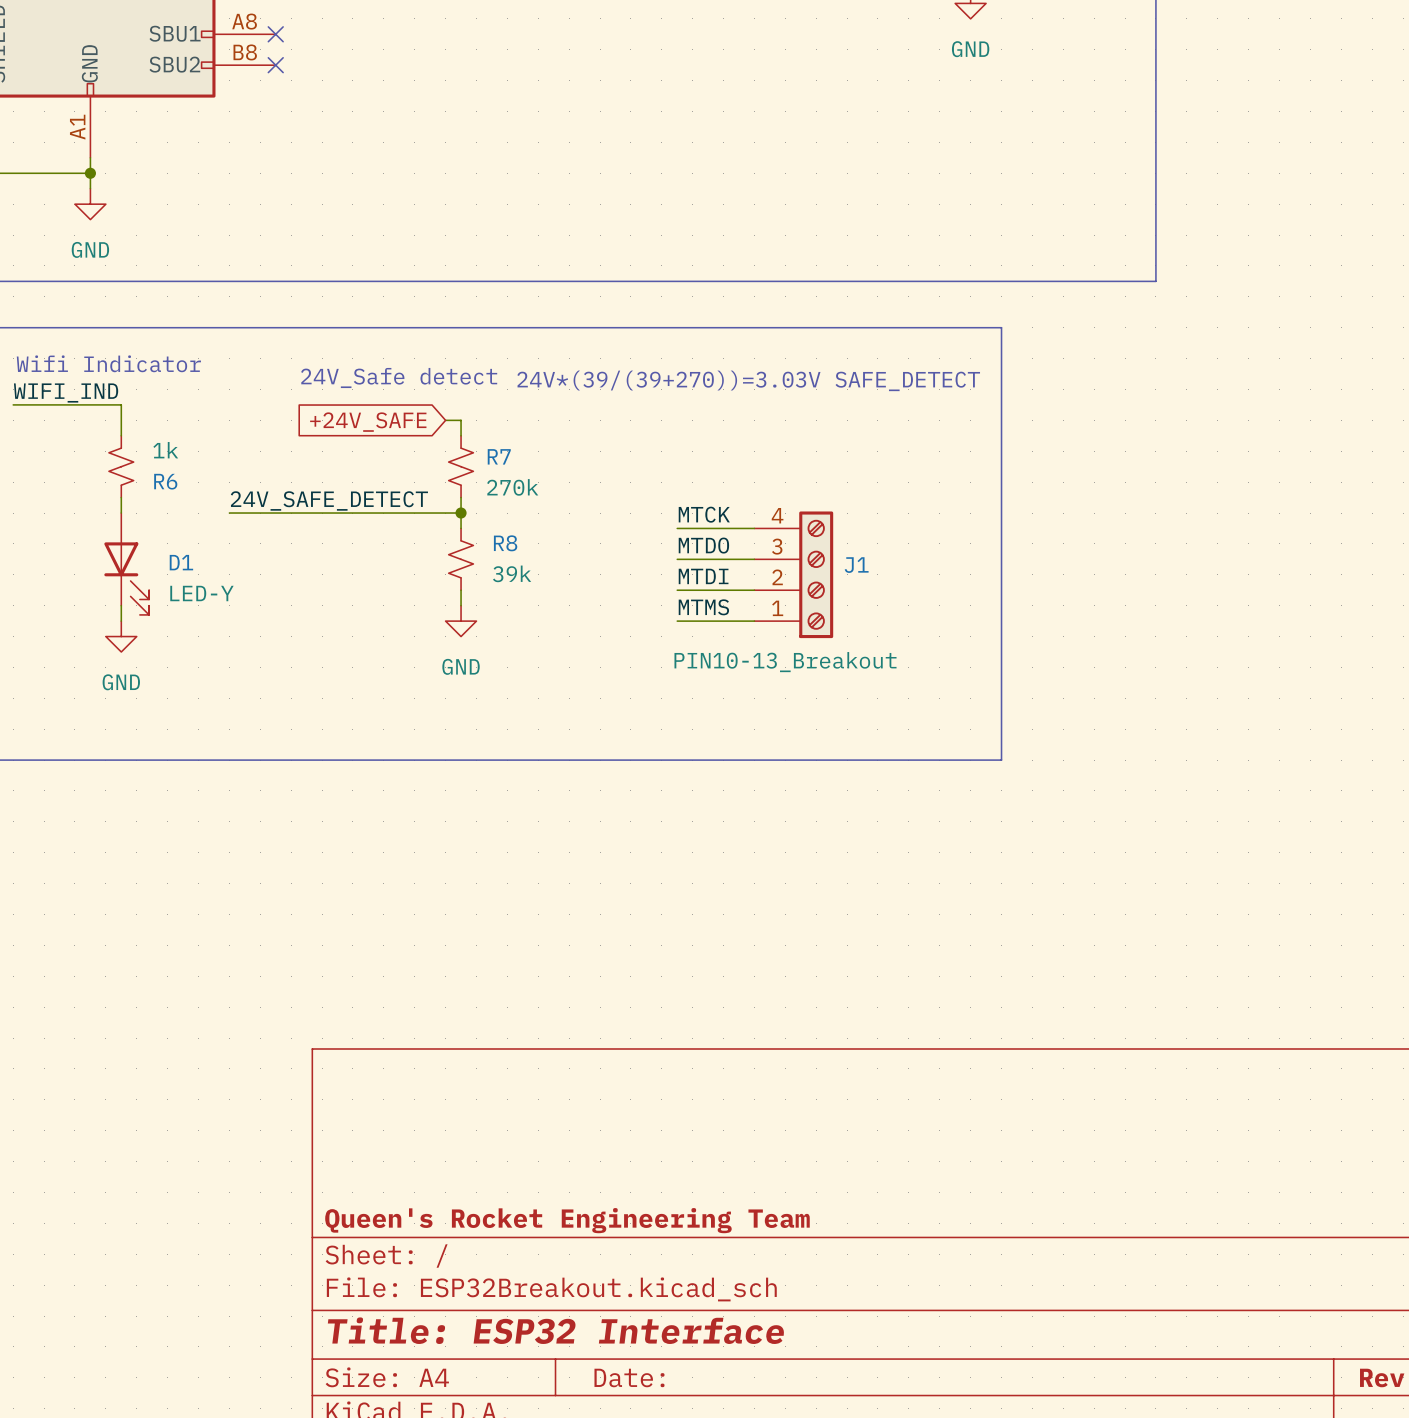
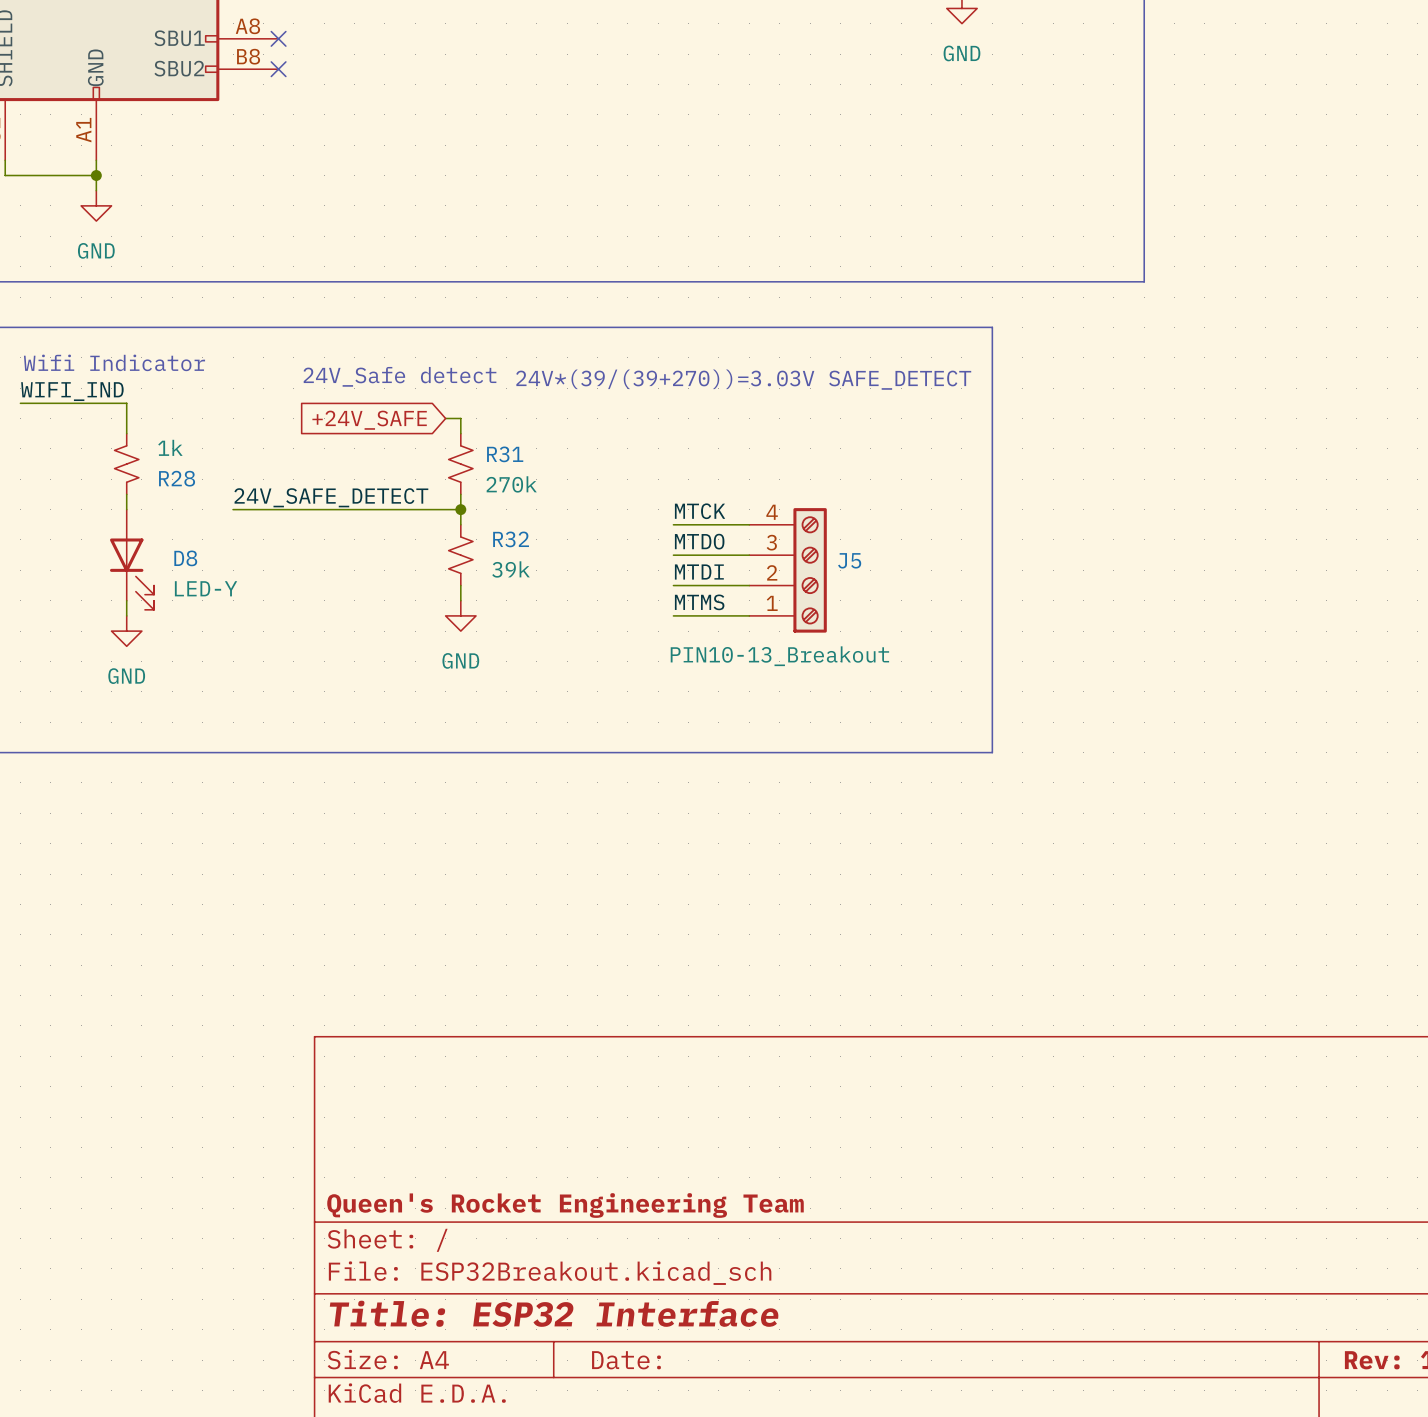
R7 name: R7 (499, 456) -> R31 (505, 454)
R6 name: R6 (165, 481) -> R28 (177, 478)
R8 name: R8 (505, 543) -> R32 (511, 539)
D1 name: D1 (181, 562) -> D8 (185, 558)
J1 name: J1 (856, 565) -> J5 (849, 560)

